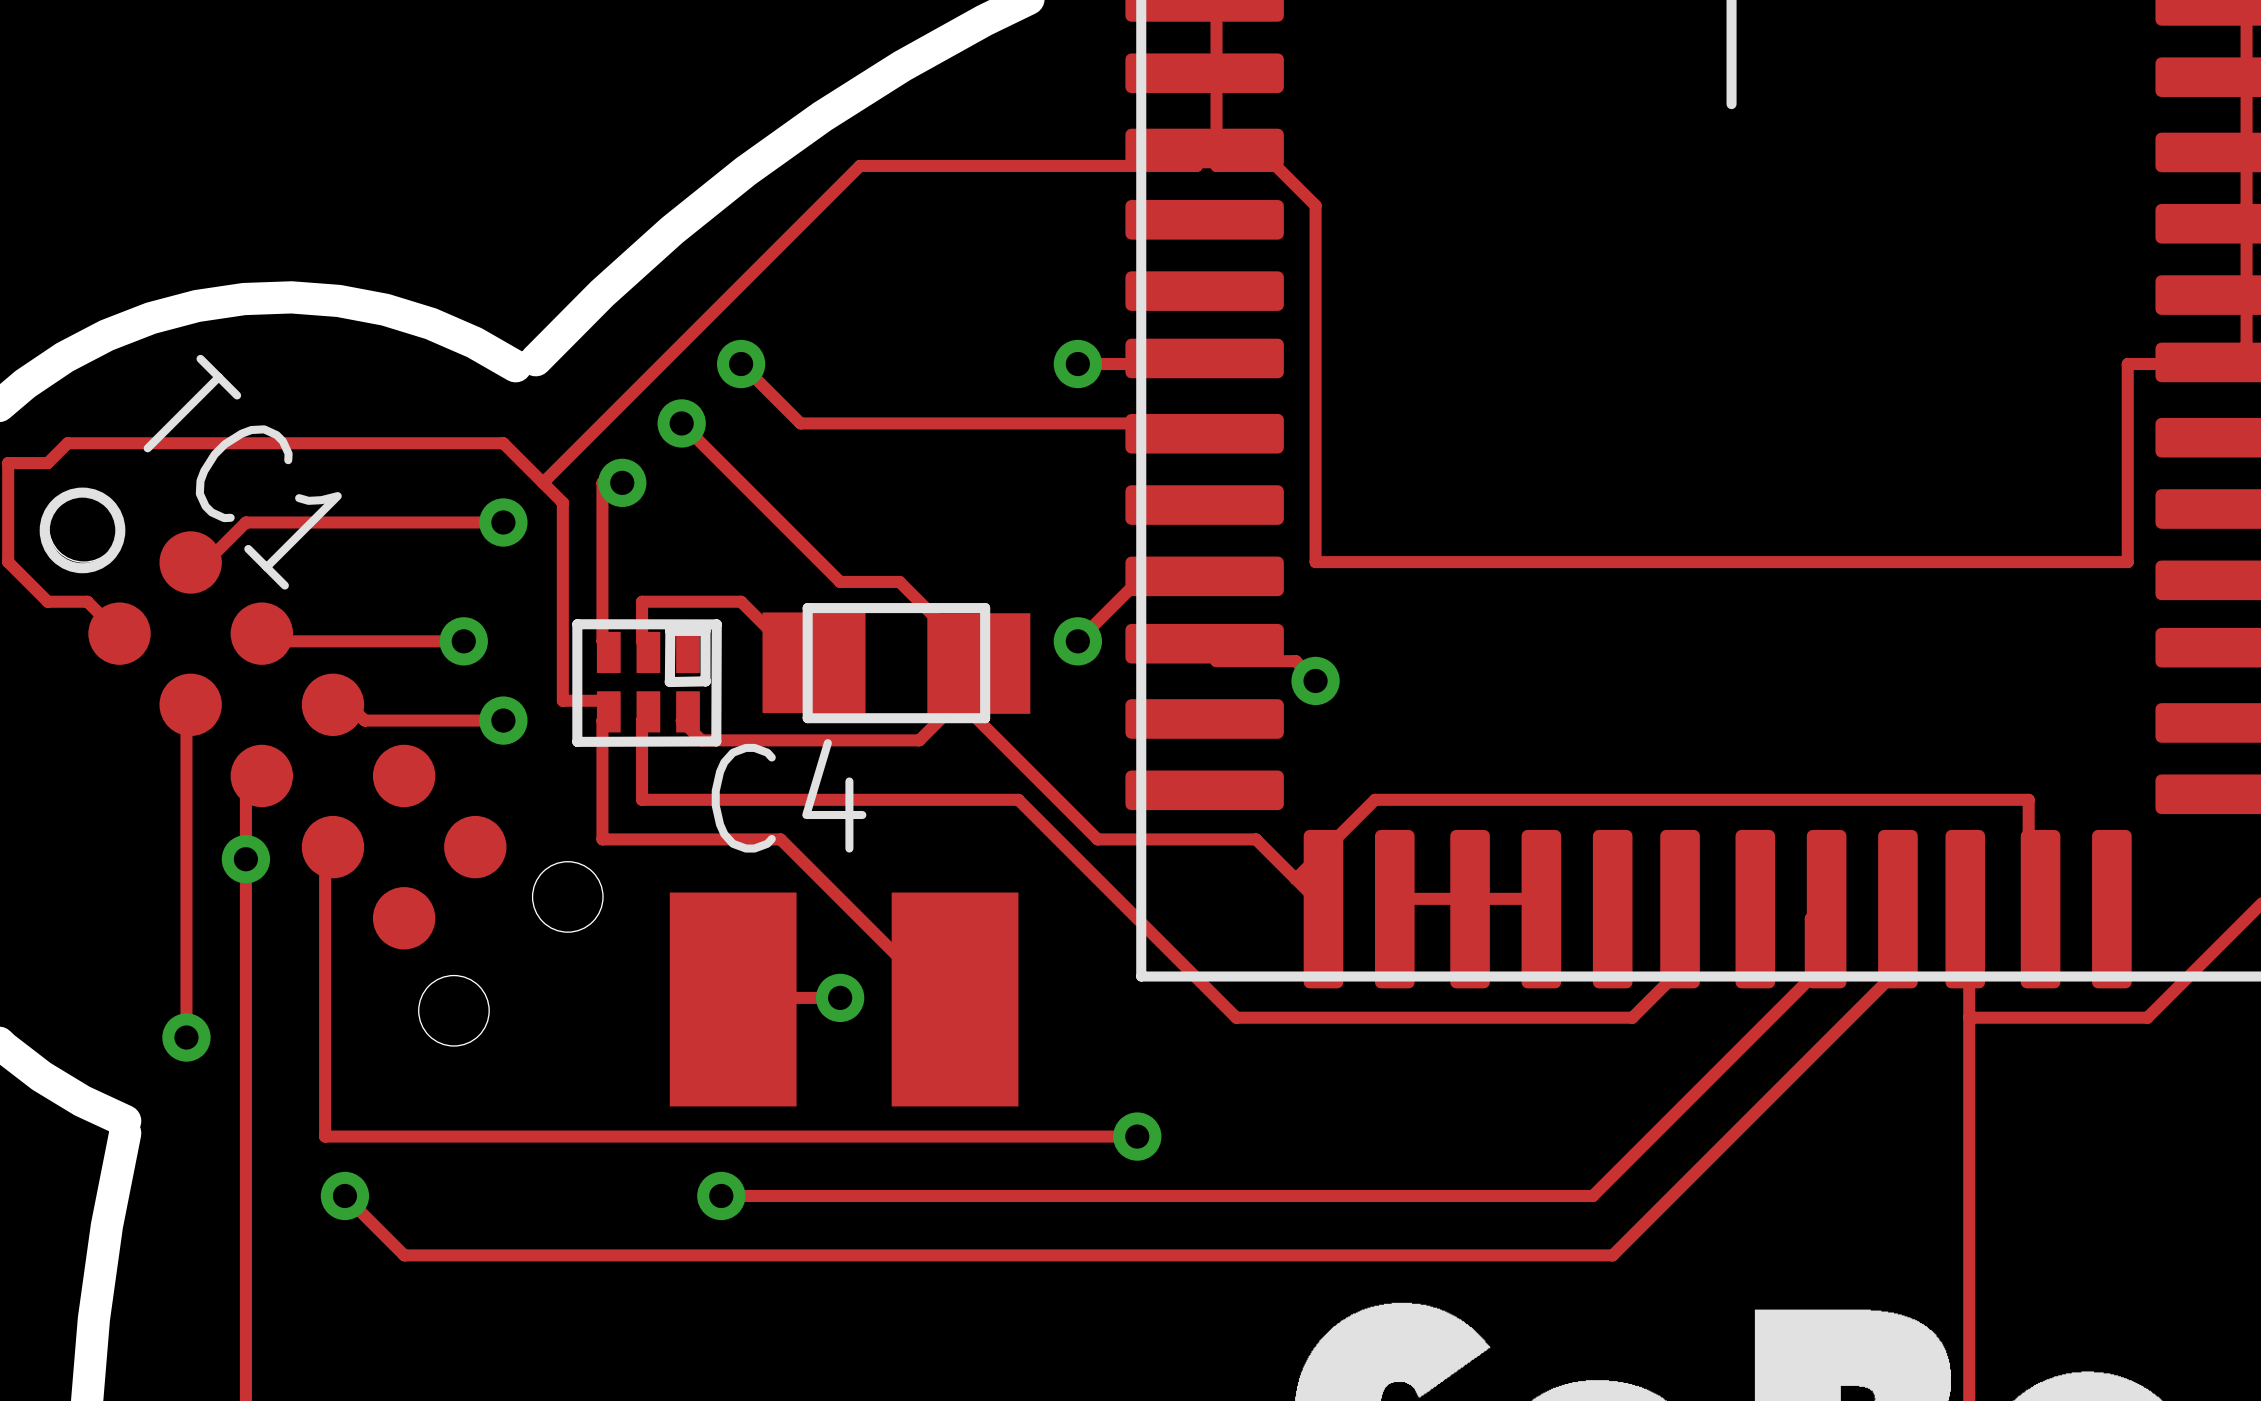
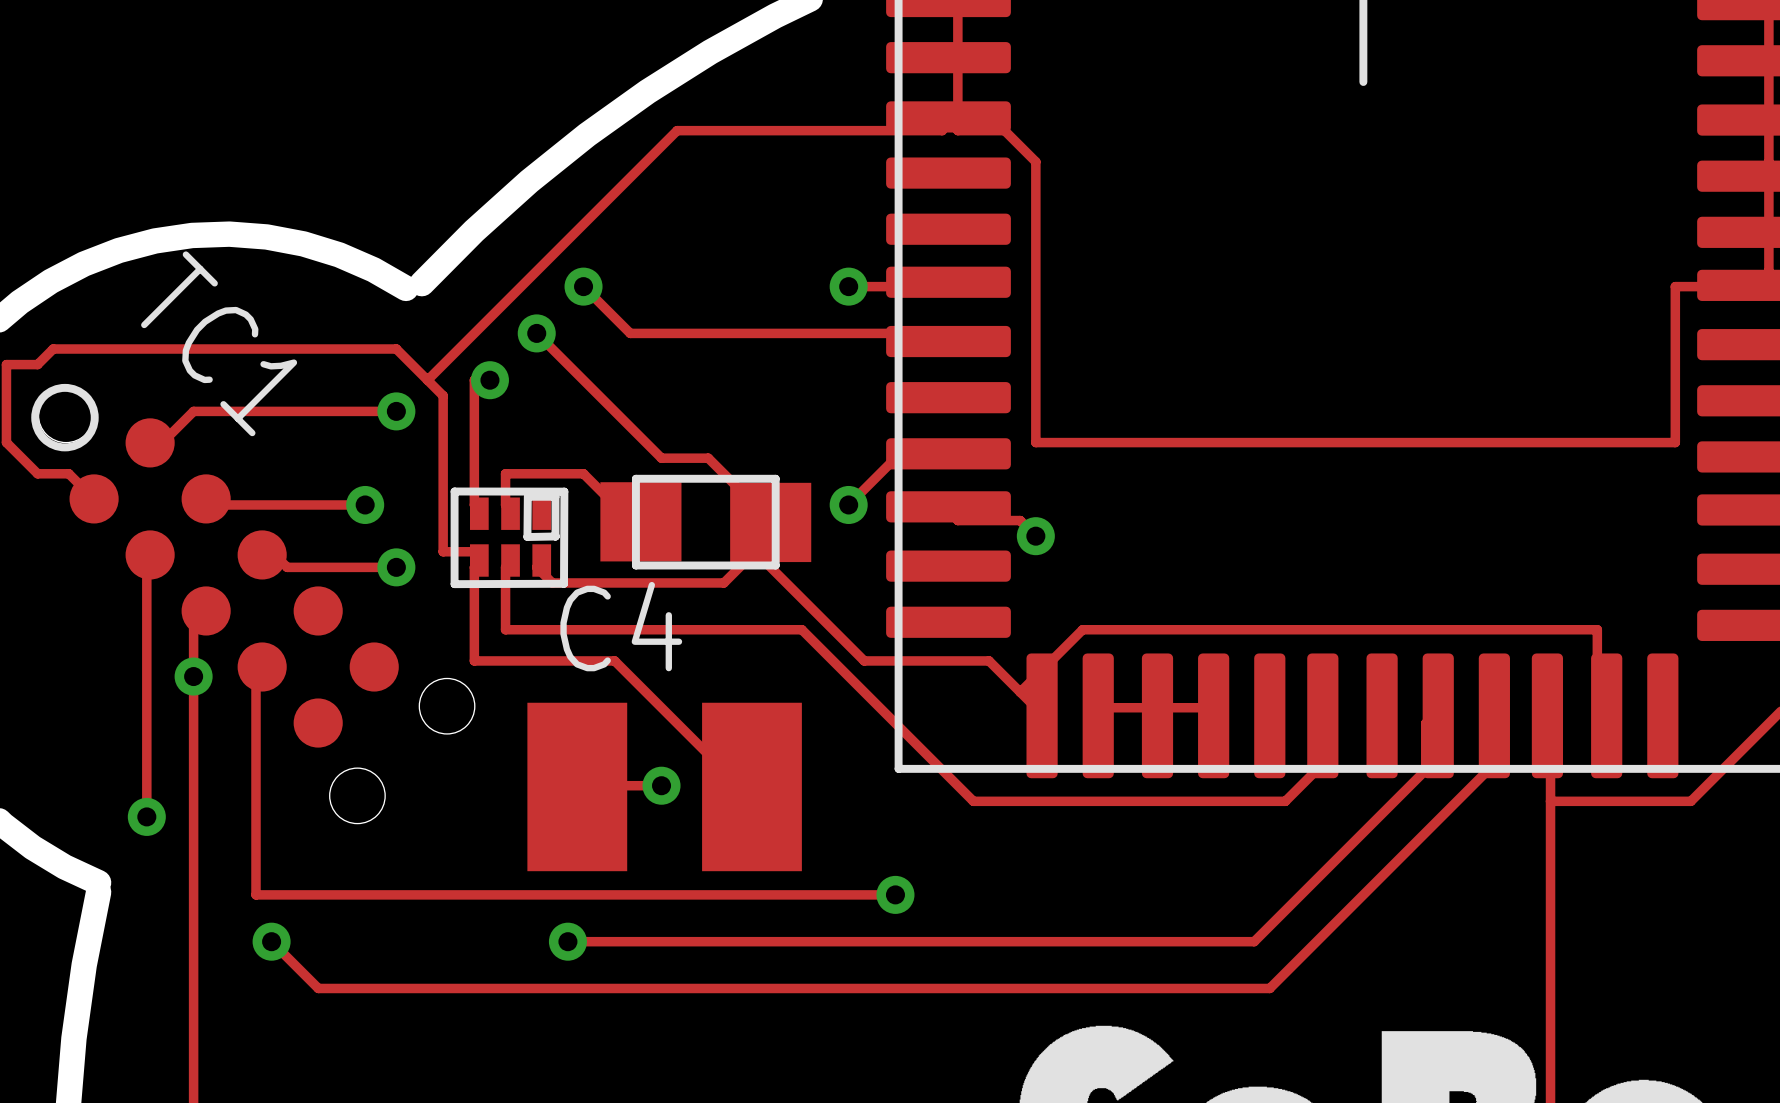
TC1 name position: TC1 (242, 472) -> TC1 (219, 343)

